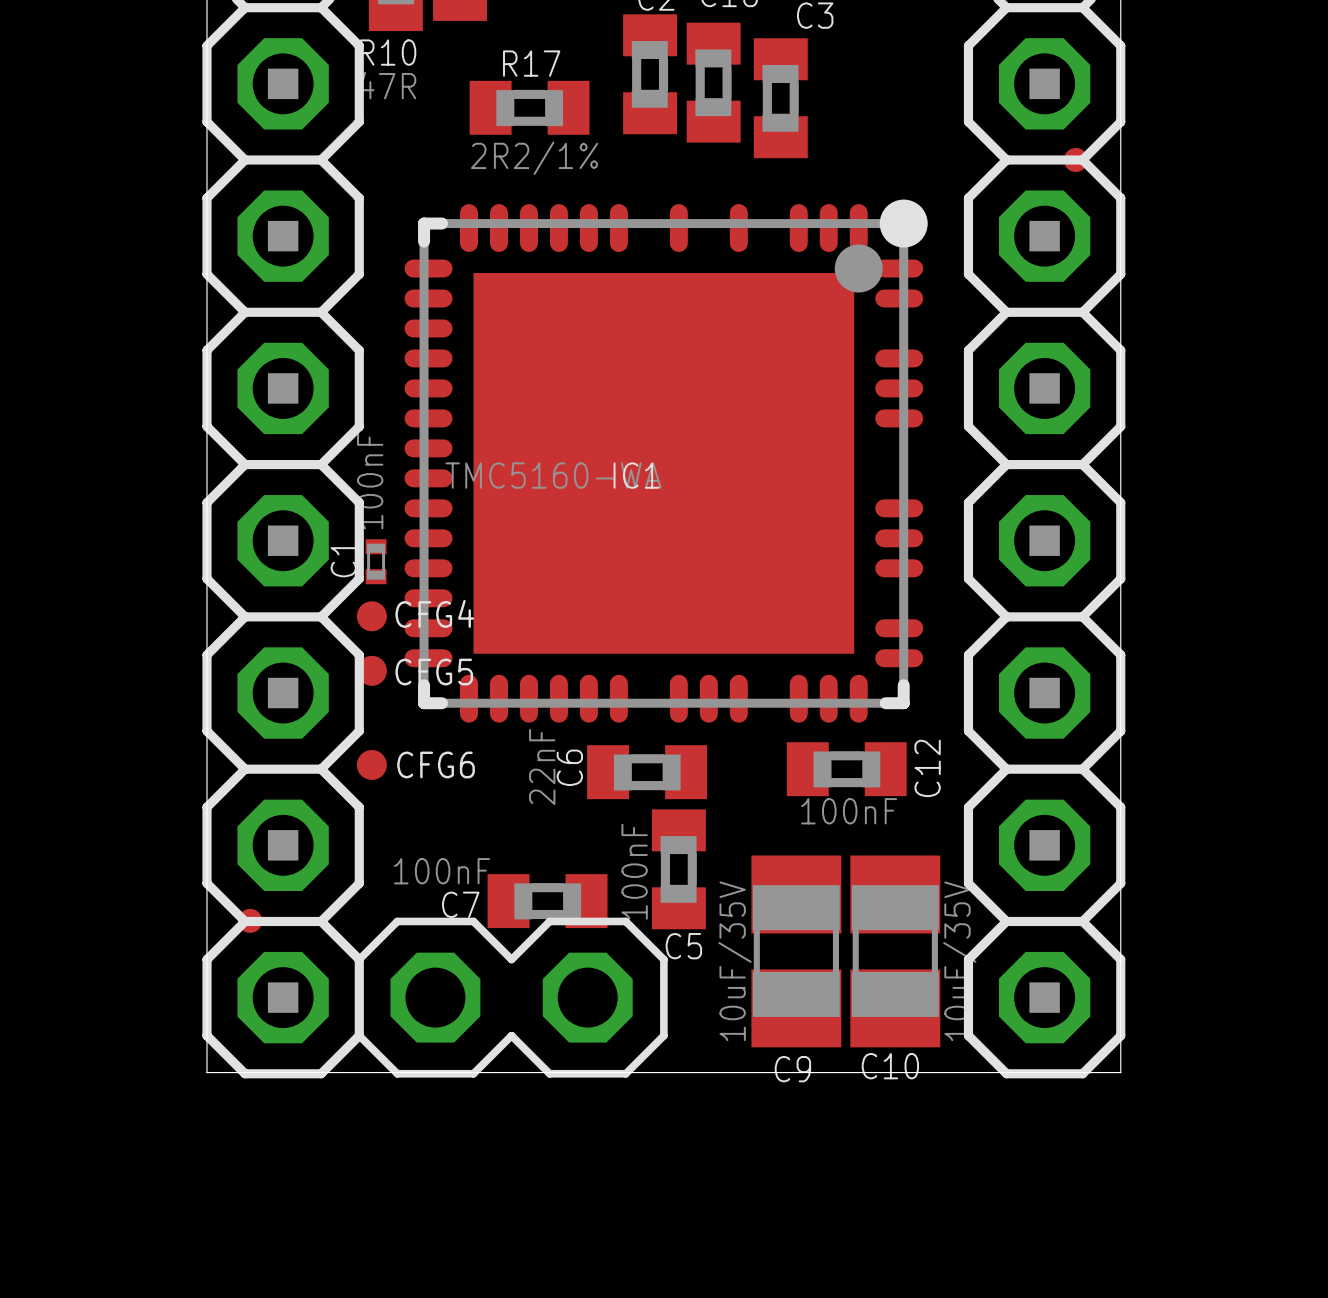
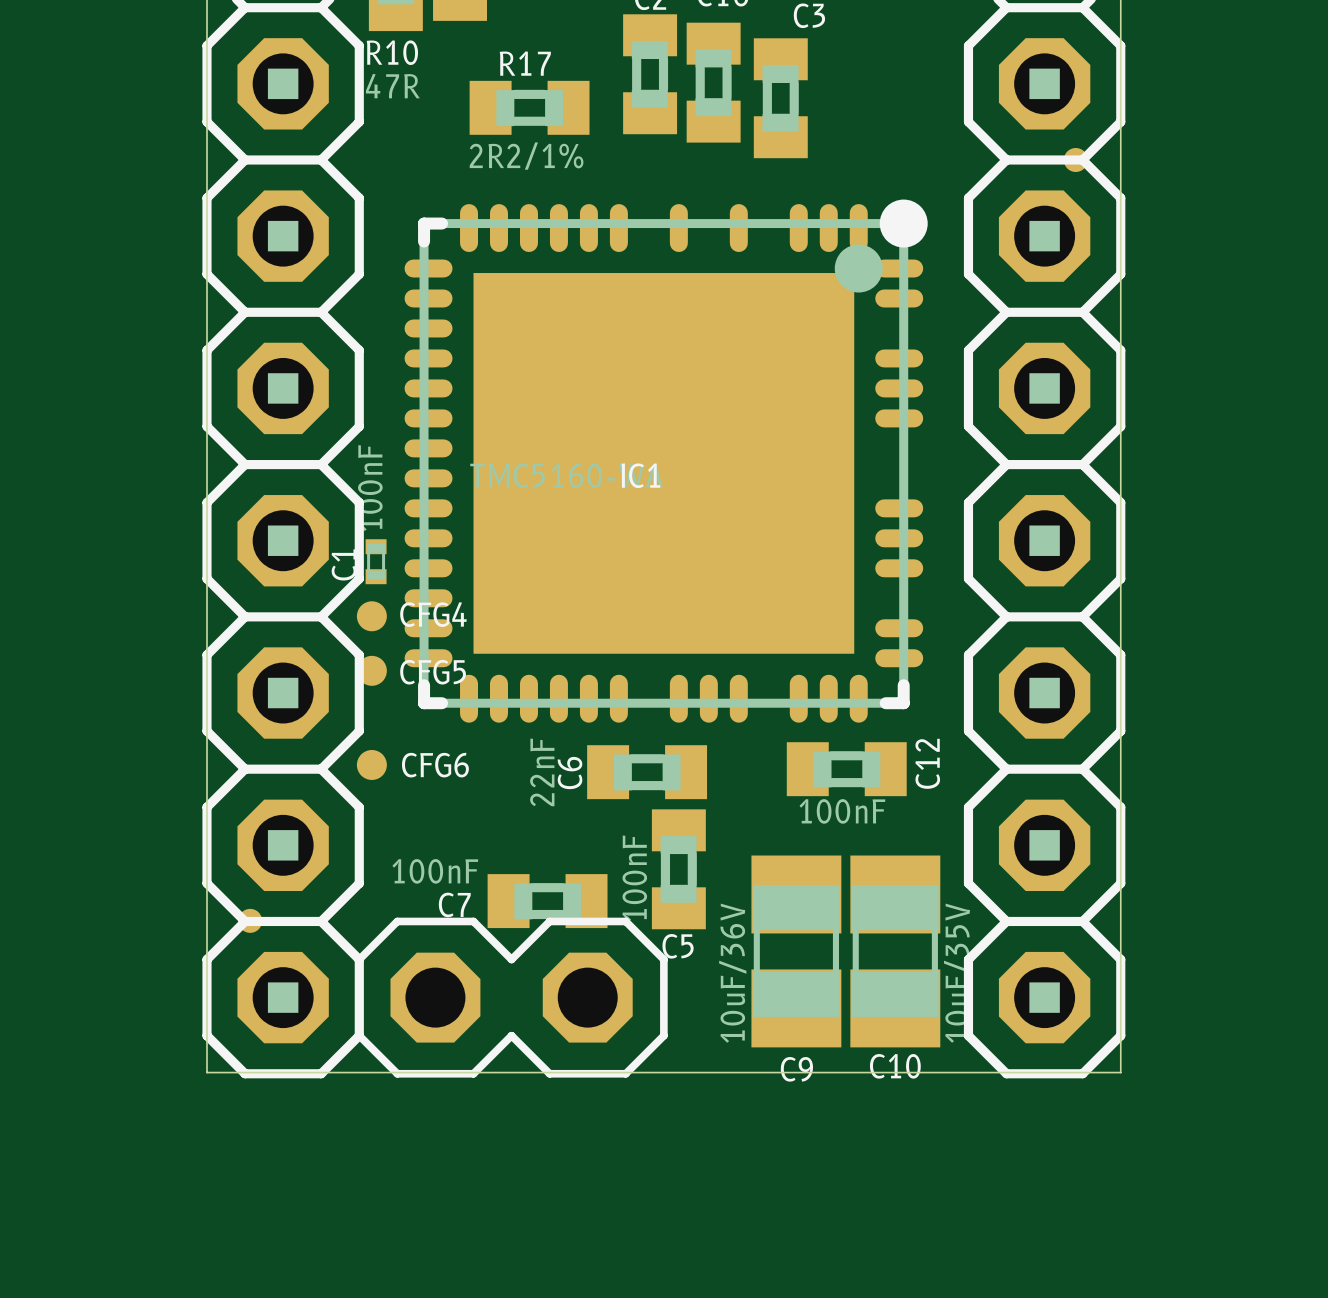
C9 value: 10uF/35V (734, 961) -> 10uF/36V (732, 973)

